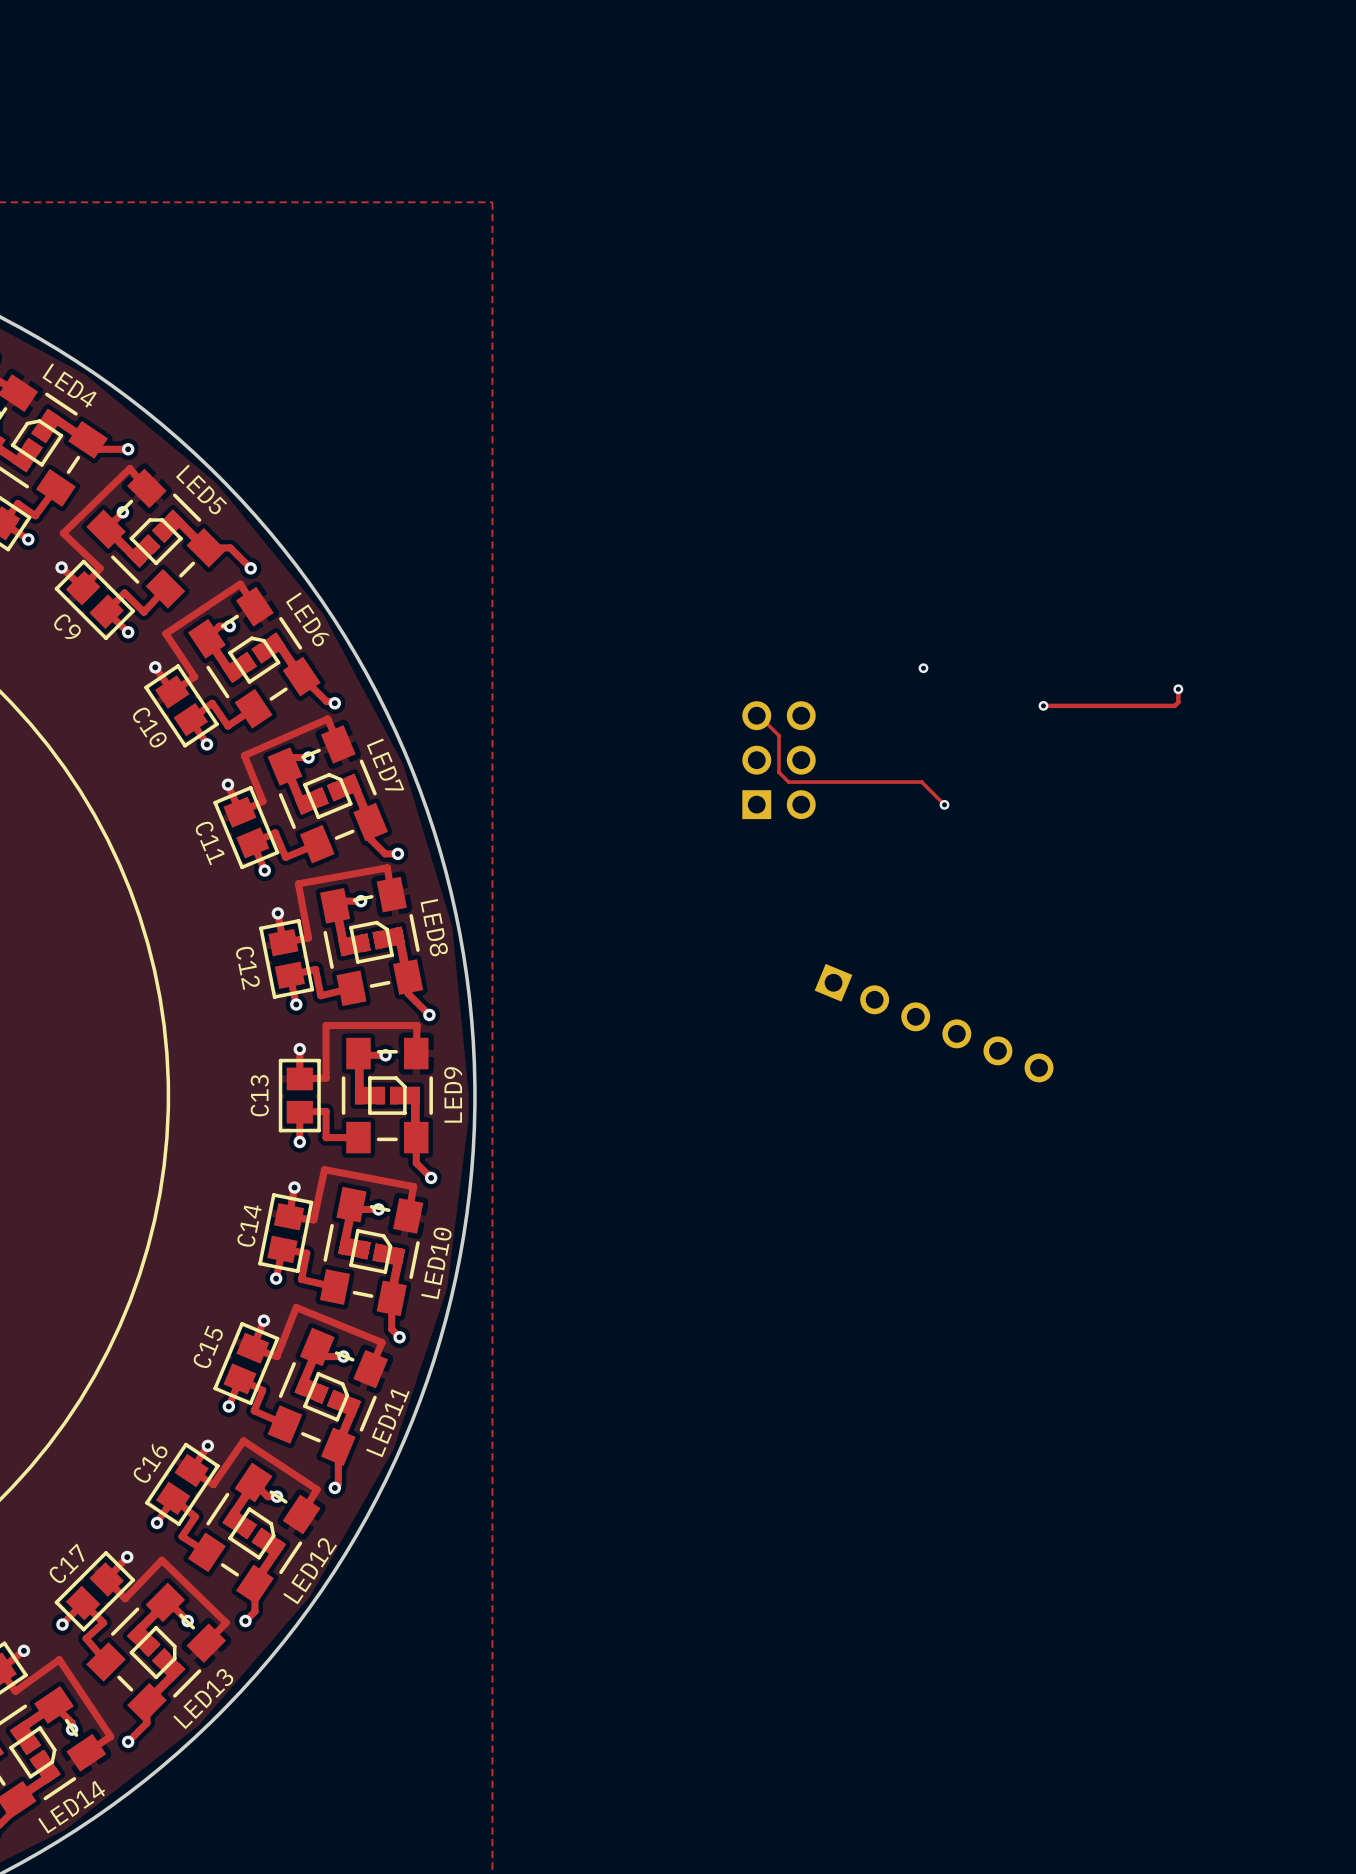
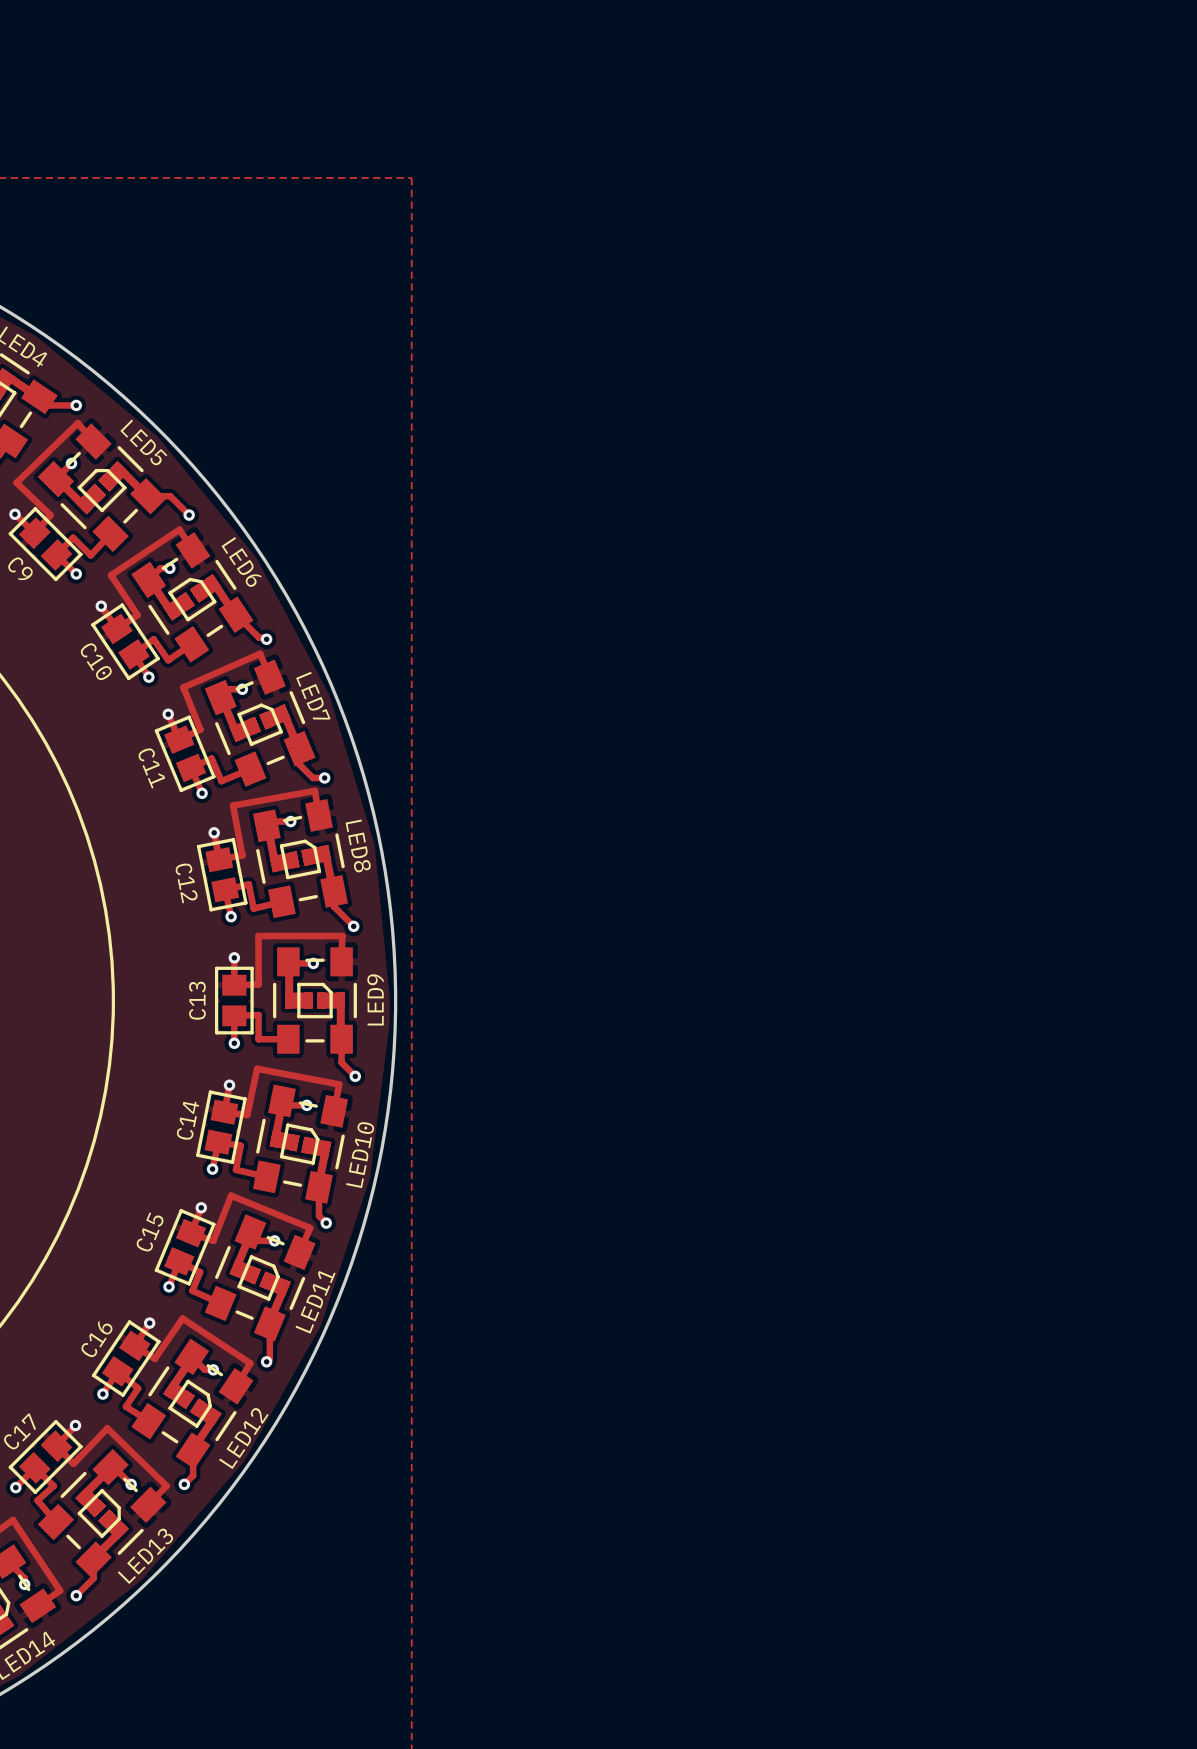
via: (923, 668) -> none
track: (1178, 689) (1178, 702) (1174, 705) (1043, 705) -> none
via: (1178, 689) -> none
via: (1043, 705) -> none
track: (756, 715) (759, 715) (779, 735) (779, 772) (788, 782) (921, 782) (944, 804) -> none
part: (779, 760) -> none
via: (944, 804) -> none
part: (934, 1023) -> none

